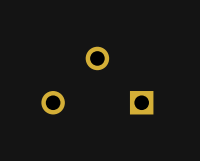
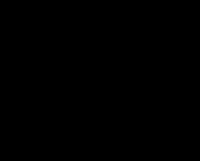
part: (97, 80) -> none

